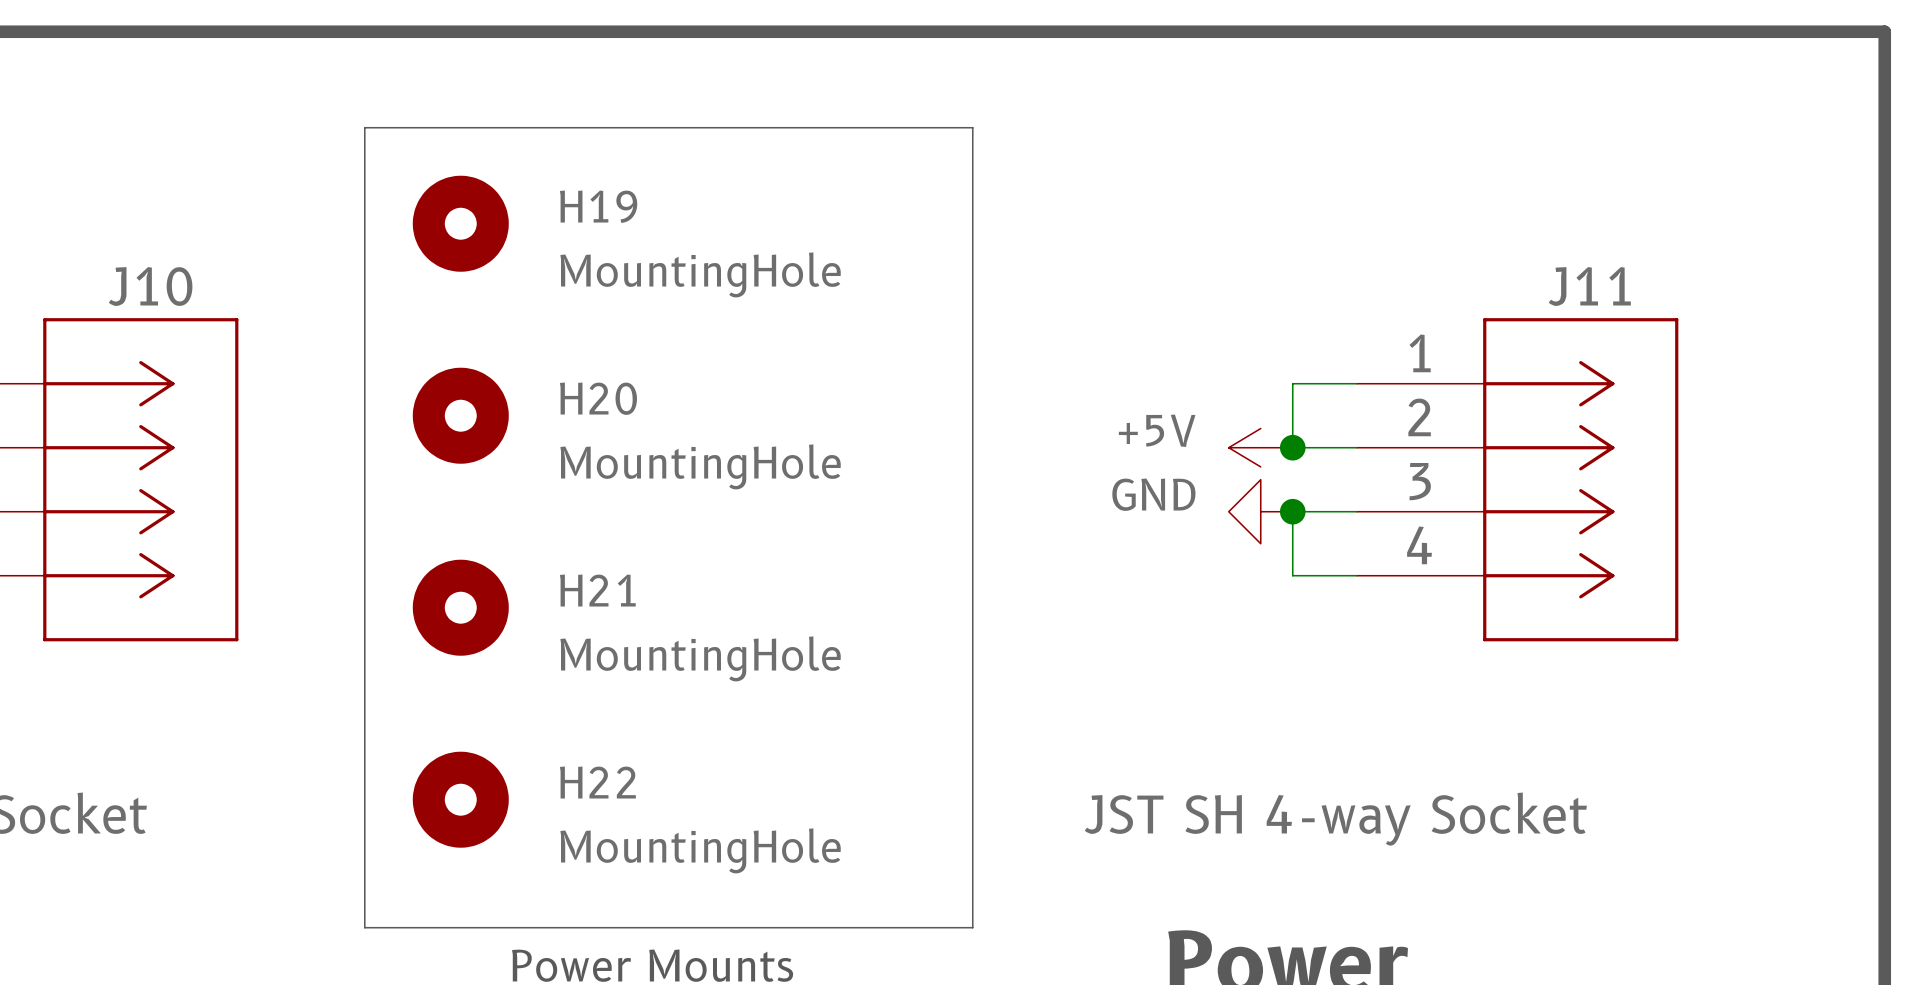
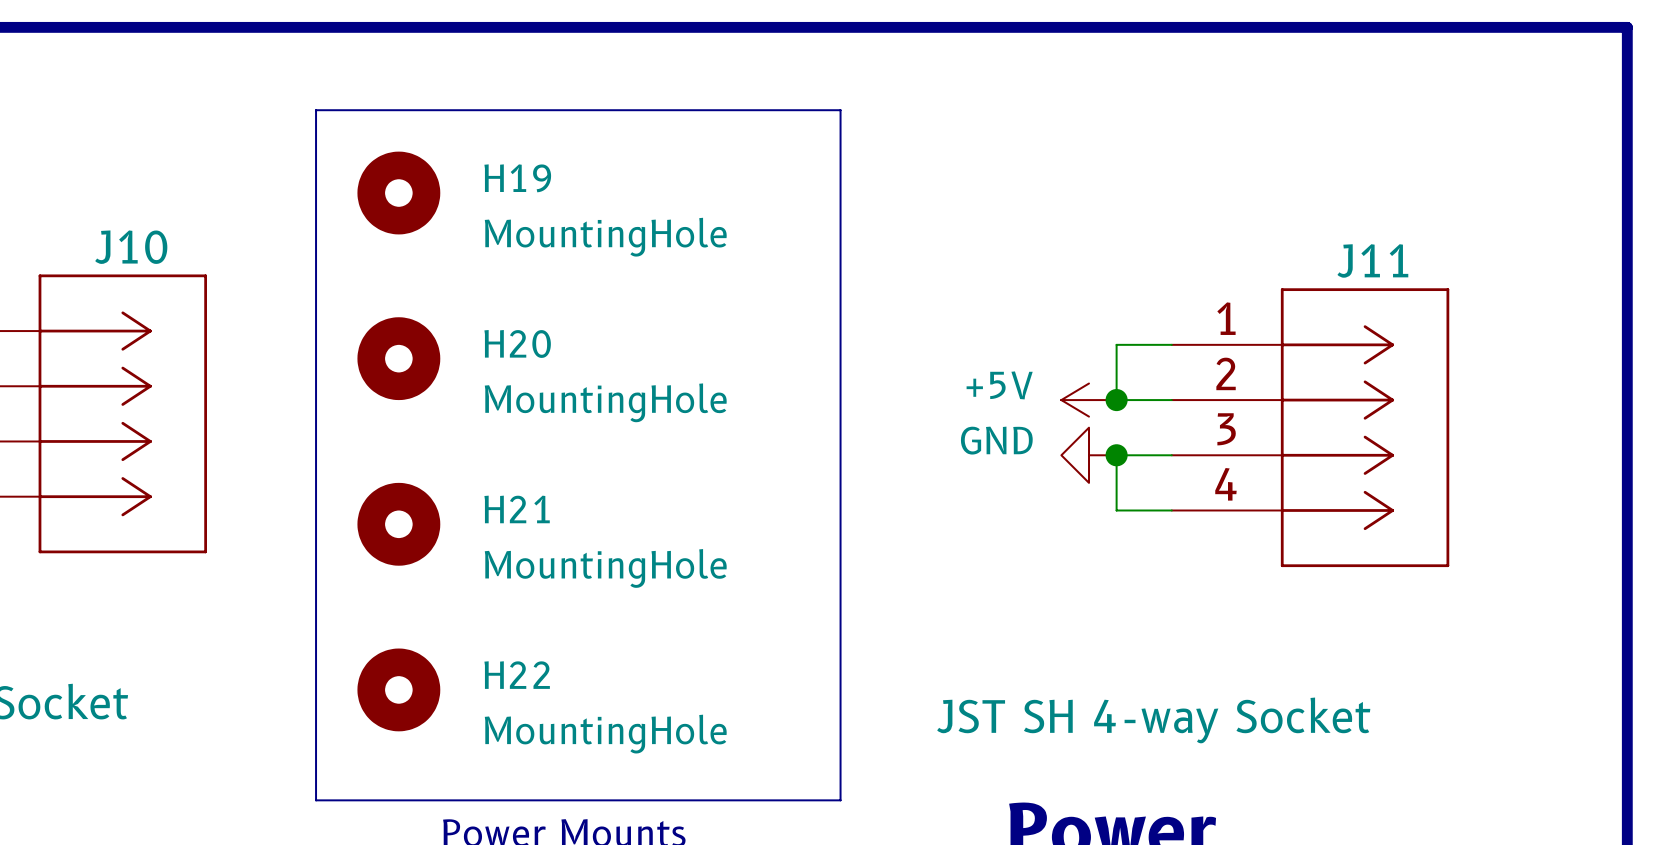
wire: (1356, 383) (1292, 383) (1292, 399) -> (1171, 344) (1116, 344)
power symbol position: +5V (1260, 447) -> +5V (1089, 400)
wire: (1292, 447) (1356, 447) -> (1116, 386) (1116, 400) (1171, 400)
junction position: (1292, 447) -> (1116, 400)
J11 position: (1517, 479) -> (1310, 427)
power symbol position: GND (1260, 511) -> GND (1089, 455)
junction position: (1292, 511) -> (1116, 455)
wire: (1356, 511) (1292, 511) (1292, 527) -> (1171, 455) (1116, 455)
wire: (1292, 575) (1356, 575) -> (1116, 496) (1116, 510) (1171, 510)

